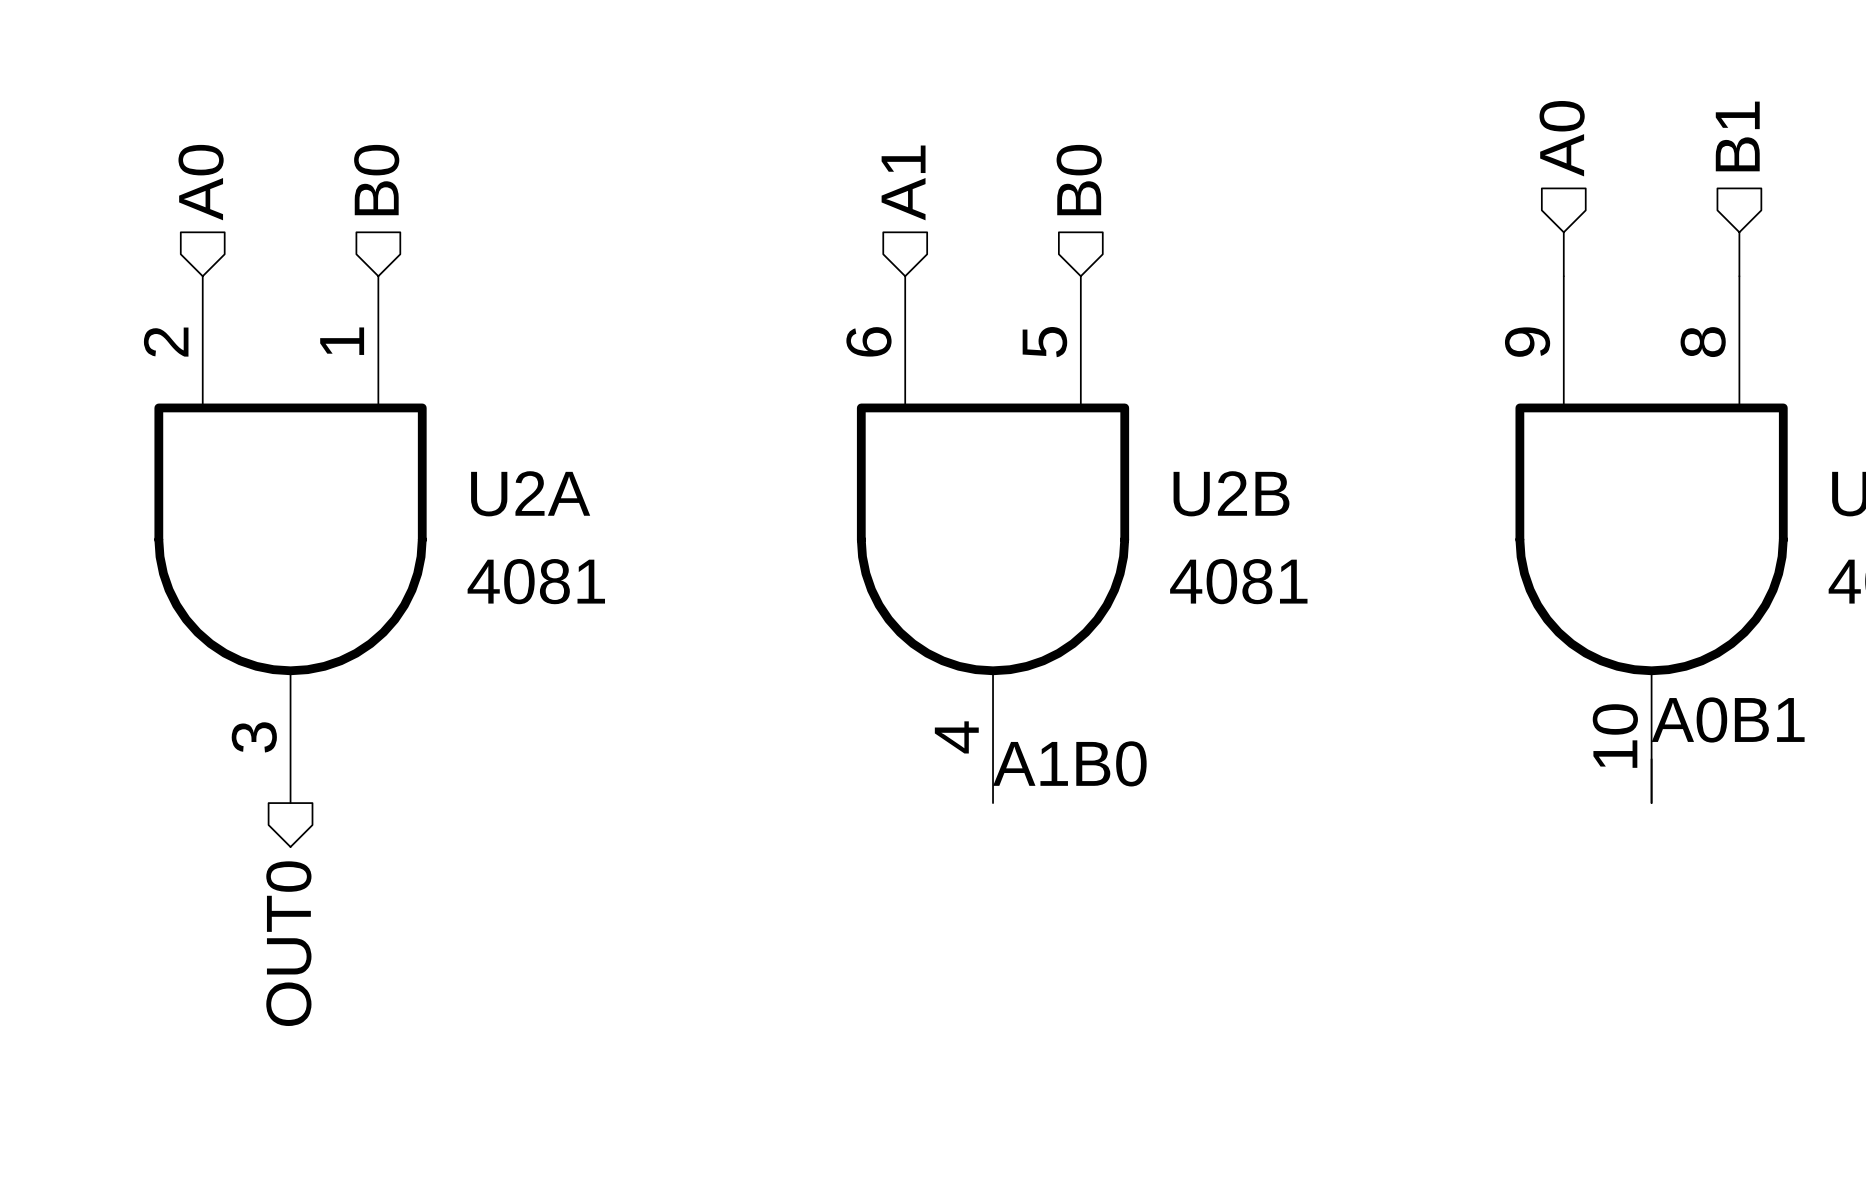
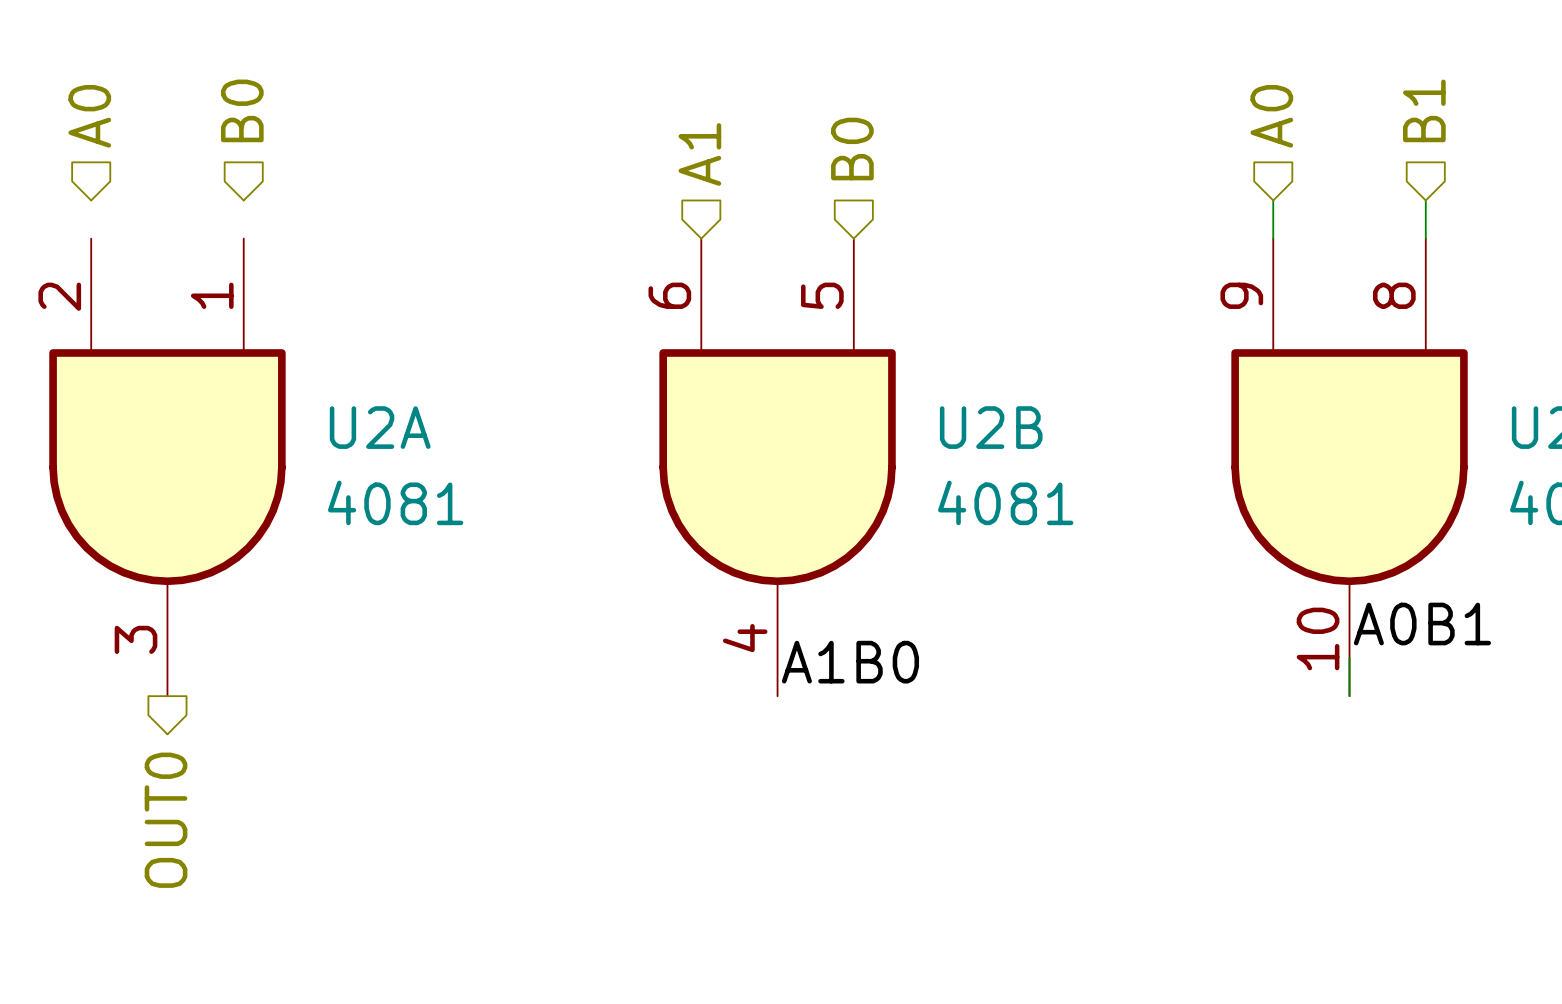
hierarchical label position: B0 (376, 180) -> B0 (242, 110)
hierarchical label position: A0 (201, 182) -> A0 (89, 116)

